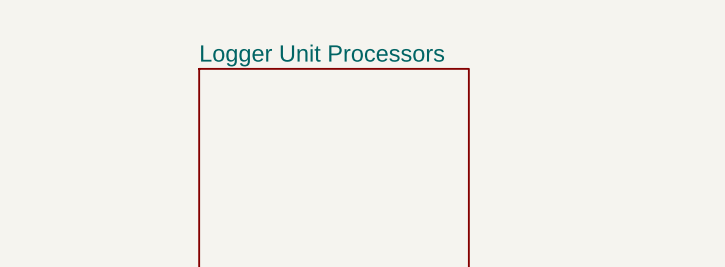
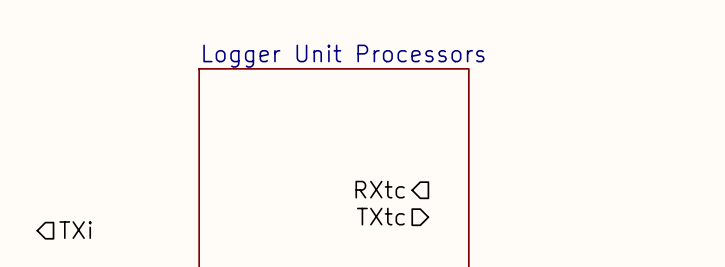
sheet pin: none -> RXtc (380, 189)
sheet pin: none -> TXtc (380, 216)
sheet pin: none -> TXi (75, 230)

